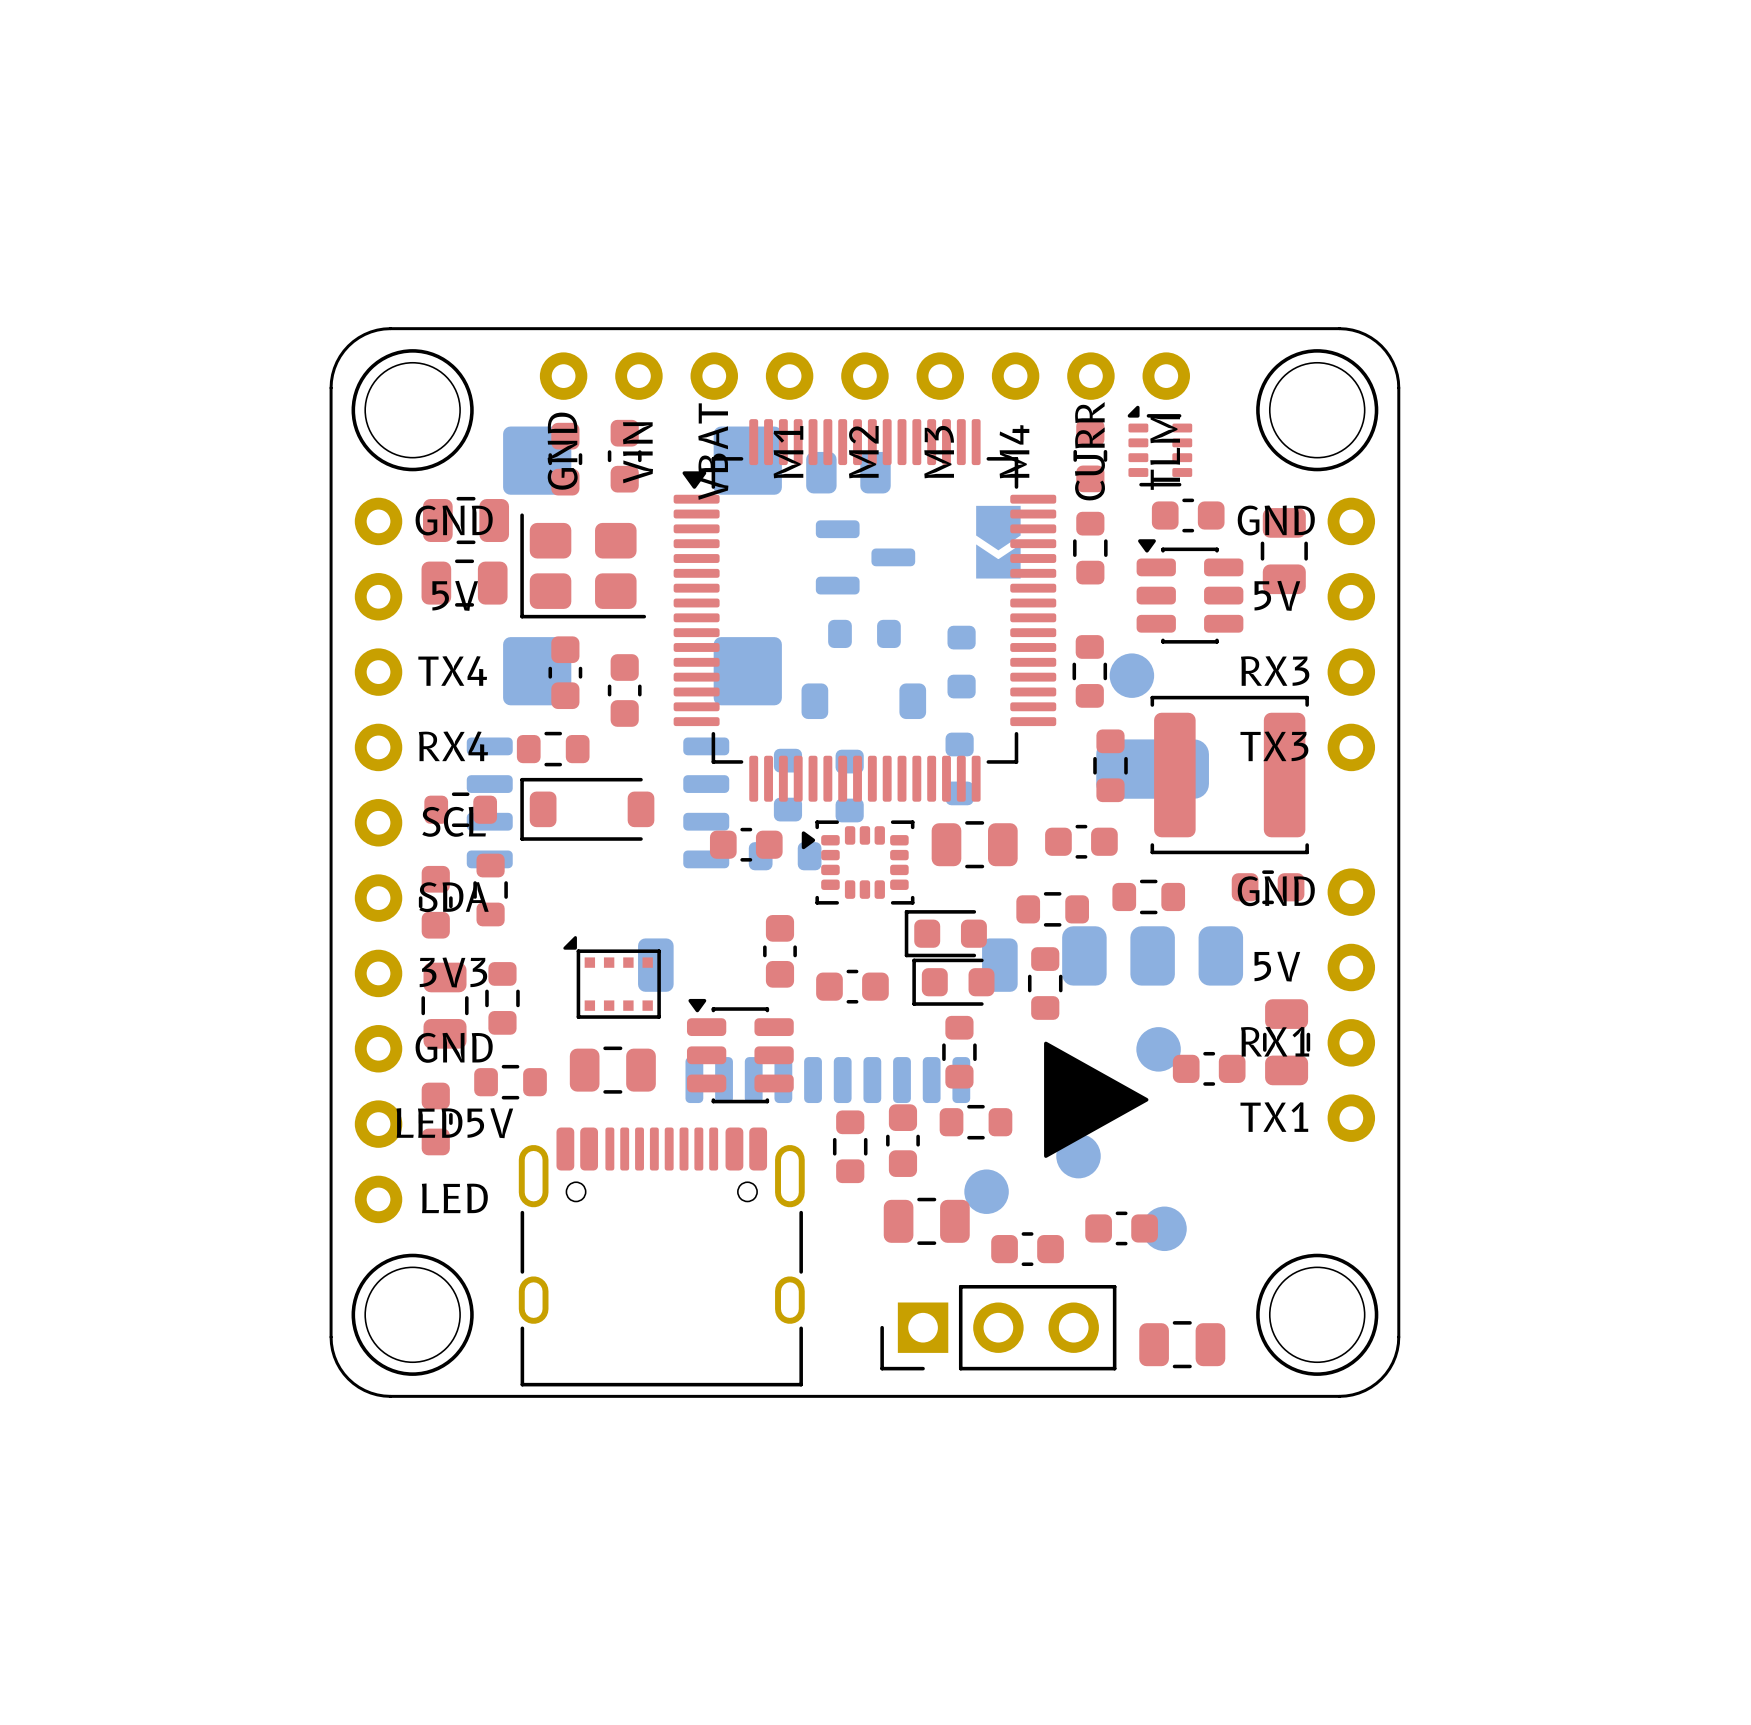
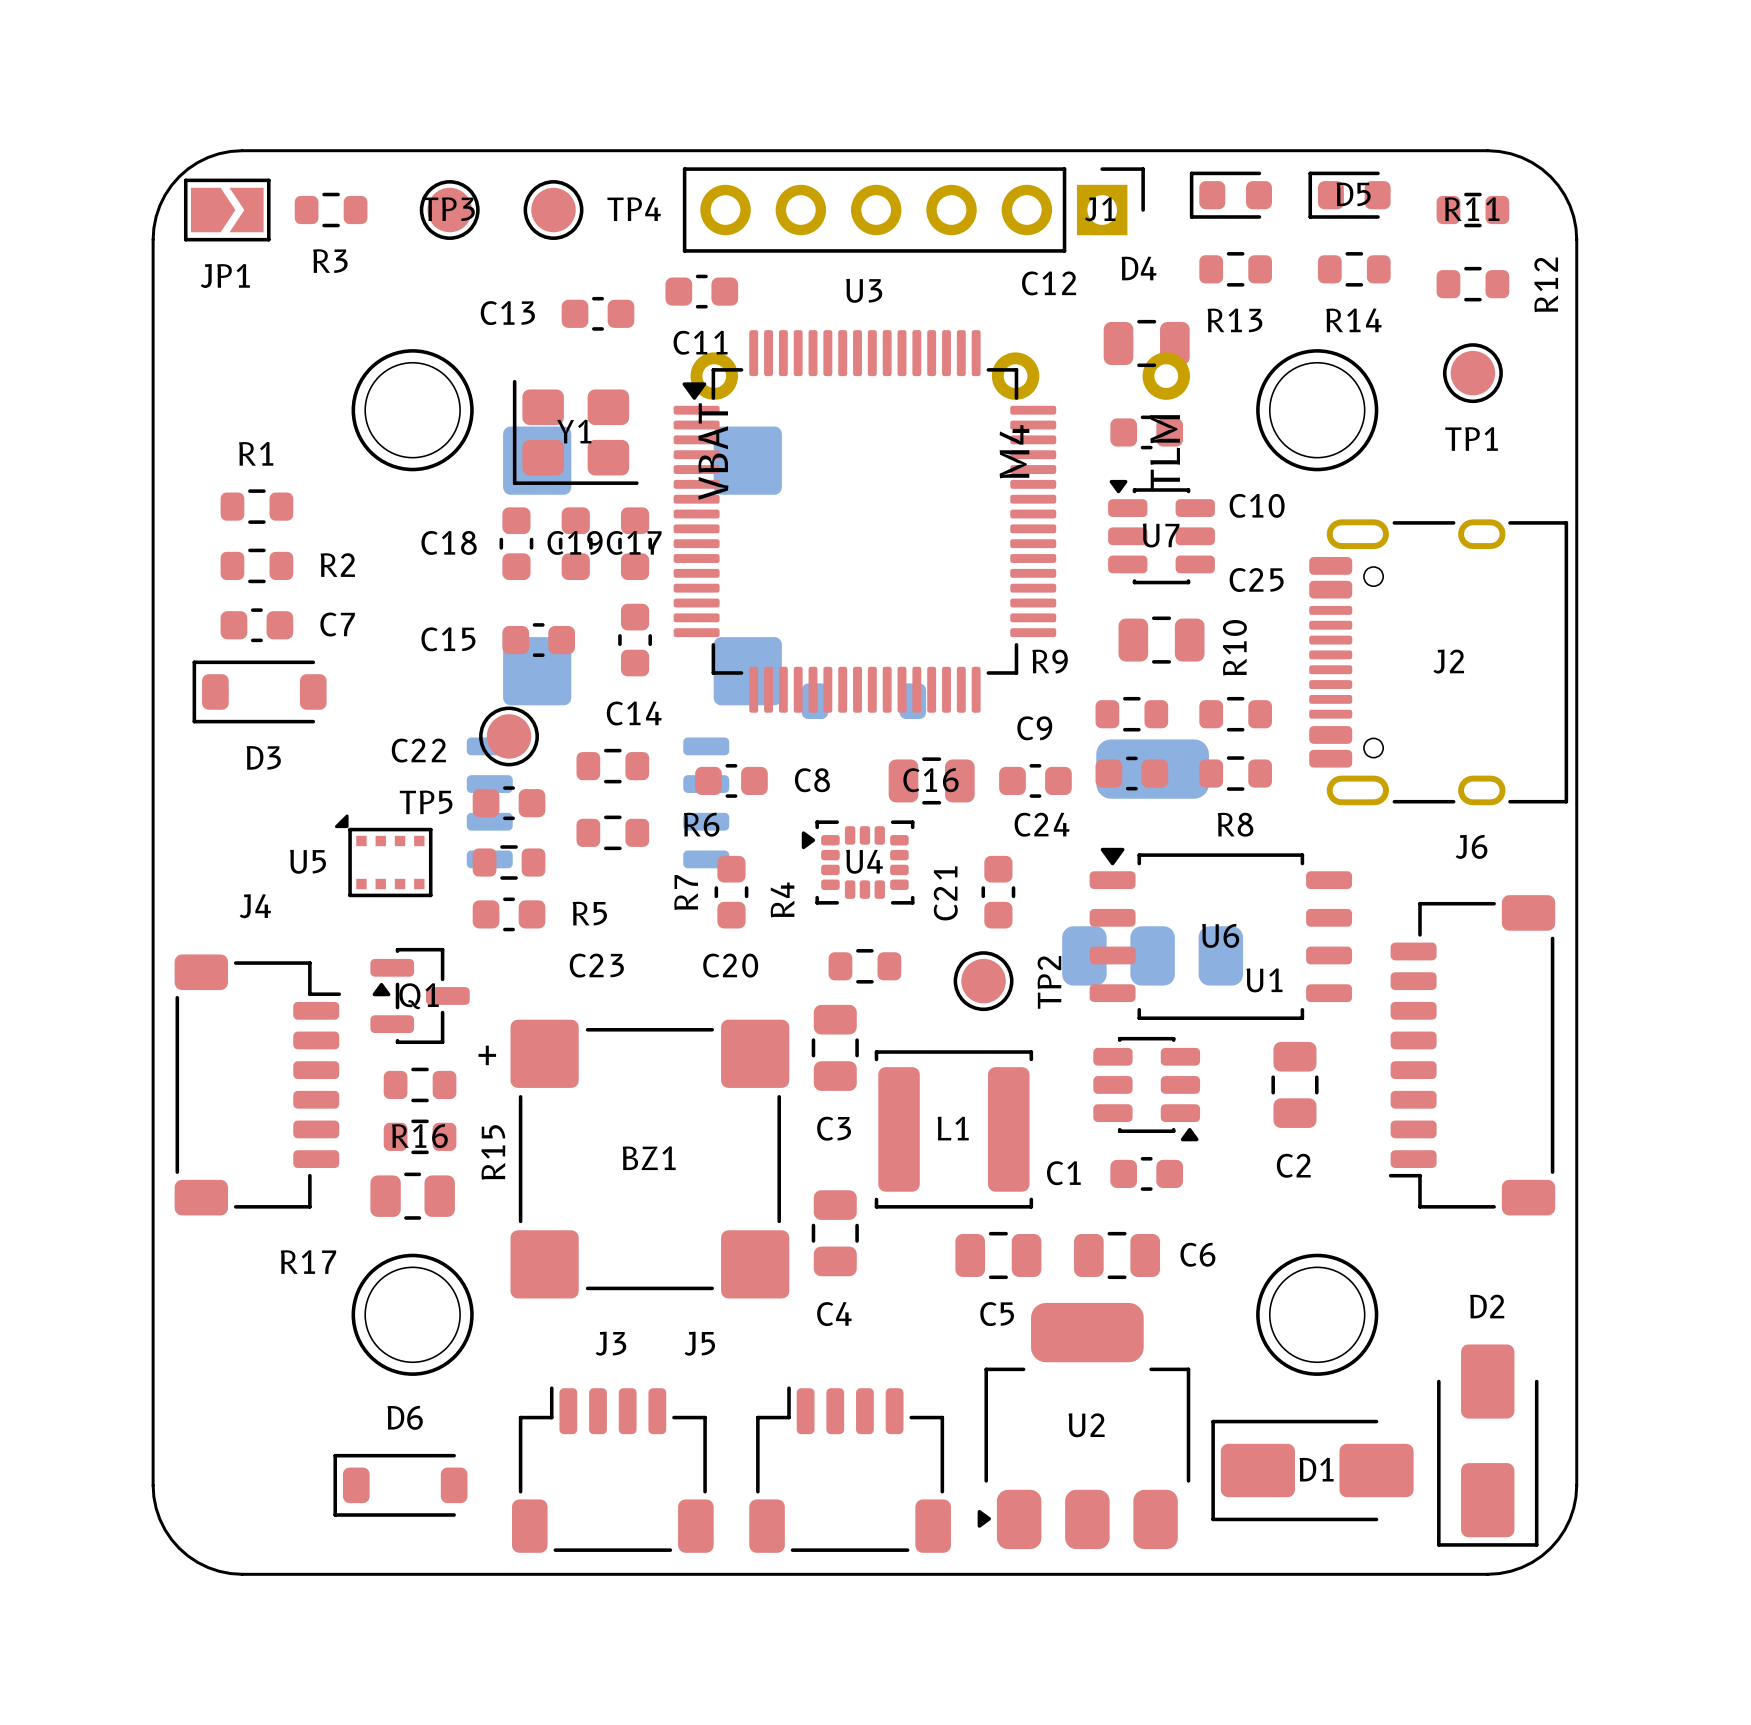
D4: none -> (1230, 195)
D5: none -> (1349, 195)
JP1: none -> (227, 210)
R3: none -> (331, 210)
TP3: none -> (449, 210)
TP4: none -> (553, 210)
J1: none -> (913, 210)
R11: none -> (1472, 210)
R13: none -> (1235, 269)
R14: none -> (1354, 269)
R12: none -> (1472, 284)
C11: none -> (701, 291)
C13: none -> (598, 313)
board edge: (390, 328) (1339, 328) (1359, 331) (1381, 346) (1392, 362) (1398, 387) (1398, 1337) (1395, 1356) (1381, 1378) (1359, 1393) (1339, 1396) (390, 1396) (364, 1390) (348, 1378) (334, 1356) (331, 1337) (331, 387) (336, 362) (348, 346) (370, 331) (390, 328) -> (242, 150) (219, 153) (208, 157) (187, 169) (179, 176) (171, 185) (159, 205) (153, 228) (153, 239) (153, 1485) (153, 1496) (159, 1519) (171, 1539) (179, 1548) (187, 1555) (208, 1567) (230, 1573) (242, 1574) (1487, 1574) (1499, 1573) (1521, 1567) (1541, 1555) (1550, 1548) (1558, 1539) (1569, 1519) (1575, 1496) (1576, 1485) (1576, 239) (1573, 216) (1569, 205) (1558, 185) (1550, 176) (1532, 162) (1521, 157) (1499, 151) (1487, 150) (242, 150)
C12: none -> (1146, 343)
TP1: none -> (1472, 373)
part: GND (563, 376) -> none
part: VIN (638, 376) -> none
part: M1 (789, 376) -> none
part: M2 (864, 376) -> none
part: M3 (940, 376) -> none
part: CURR (1090, 376) -> none
Y1: none -> (575, 432)
C10: none -> (1146, 432)
part: (1159, 446) -> none
part: (1090, 455) -> none
part: (624, 456) -> none
part: (565, 459) -> none
part: (848, 472) -> none
R1: none -> (256, 506)
part: (1188, 515) -> none
part: (466, 520) -> none
part: GND (378, 521) -> none
U3: none -> (864, 521)
part: GND (1351, 521) -> none
U7: none -> (1161, 532)
part: (998, 542) -> none
C18: none -> (516, 543)
C19: none -> (575, 543)
C17: none -> (635, 543)
part: (1090, 548) -> none
part: (1284, 551) -> none
part: (865, 557) -> none
R2: none -> (256, 565)
part: (583, 565) -> none
part: (464, 583) -> none
part: (1189, 591) -> none
part: 5V (378, 596) -> none
part: 5V (1351, 596) -> none
part: (864, 610) -> none
C7: none -> (256, 625)
part: (864, 633) -> none
C15: none -> (538, 640)
C14: none -> (635, 640)
C25: none -> (1161, 640)
part: (961, 662) -> none
J2: none -> (1438, 662)
part: (1089, 671) -> none
part: TX4 (378, 672) -> none
part: (565, 672) -> none
part: RX3 (1351, 672) -> none
part: (1131, 675) -> none
part: (624, 690) -> none
D3: none -> (259, 691)
R9: none -> (1131, 714)
R10: none -> (1235, 714)
TP5: none -> (509, 736)
part: RX4 (378, 747) -> none
part: TX3 (1351, 747) -> none
part: (553, 749) -> none
part: (1110, 765) -> none
R6: none -> (612, 766)
part: (959, 768) -> none
C24: none -> (1131, 773)
R8: none -> (1235, 773)
part: (1229, 775) -> none
C8: none -> (731, 780)
C16: none -> (931, 780)
C9: none -> (1035, 780)
part: (787, 785) -> none
part: (849, 786) -> none
C22: none -> (509, 803)
part: (460, 809) -> none
part: (587, 809) -> none
part: SCL (378, 822) -> none
R7: none -> (612, 832)
part: (1081, 841) -> none
part: (746, 844) -> none
part: (974, 844) -> none
U5: none -> (383, 855)
part: (785, 856) -> none
U4 name: none -> U4 (864, 861)
R5: none -> (509, 862)
part: (1268, 887) -> none
part: (490, 890) -> none
C20: none -> (731, 892)
C21: none -> (998, 892)
part: GND (1351, 892) -> none
part: (1148, 896) -> none
part: SDA (378, 898) -> none
part: (435, 902) -> none
part: (1052, 909) -> none
C23: none -> (509, 914)
part: (945, 933) -> none
U6: none -> (1220, 933)
part: (779, 951) -> none
R4: none -> (864, 966)
part: 5V (1351, 967) -> none
part: 3V3 (378, 973) -> none
part: (612, 977) -> none
TP2: none -> (983, 981)
part: (953, 982) -> none
part: (1045, 983) -> none
part: (852, 986) -> none
Q1: none -> (420, 995)
part: (502, 998) -> none
part: (445, 1005) -> none
part: (827, 1020) -> none
drawing: [1044, 1041, 1149, 1158] -> none
part: (1286, 1042) -> none
part: RX1 (1351, 1042) -> none
C3: none -> (835, 1047)
part: GND (378, 1048) -> none
part: (1158, 1049) -> none
part: (740, 1051) -> none
part: (959, 1052) -> none
J6: none -> (1472, 1055)
part: (1209, 1068) -> none
part: (612, 1070) -> none
part: (510, 1082) -> none
J4: none -> (257, 1084)
R15: none -> (420, 1084)
C2: none -> (1294, 1084)
U1: none -> (1146, 1089)
part: (435, 1118) -> none
part: TX1 (1351, 1118) -> none
part: (975, 1122) -> none
part: LED5V (378, 1124) -> none
L1: none -> (953, 1129)
R16: none -> (420, 1136)
part: (902, 1140) -> none
part: (850, 1146) -> none
part: (1078, 1156) -> none
BZ1: none -> (649, 1159)
C1: none -> (1146, 1173)
part: (986, 1191) -> none
R17: none -> (412, 1196)
part: LED (378, 1199) -> none
part: (926, 1221) -> none
part: (1121, 1228) -> none
part: (1164, 1228) -> none
C4: none -> (835, 1233)
part: (1027, 1249) -> none
C5: none -> (998, 1255)
C6: none -> (1117, 1255)
part: (661, 1256) -> none
part: (998, 1327) -> none
part: (1182, 1344) -> none
U2: none -> (1083, 1426)
D2: none -> (1487, 1445)
J3: none -> (612, 1469)
J5: none -> (850, 1469)
D1: none -> (1312, 1470)
D6: none -> (400, 1485)

